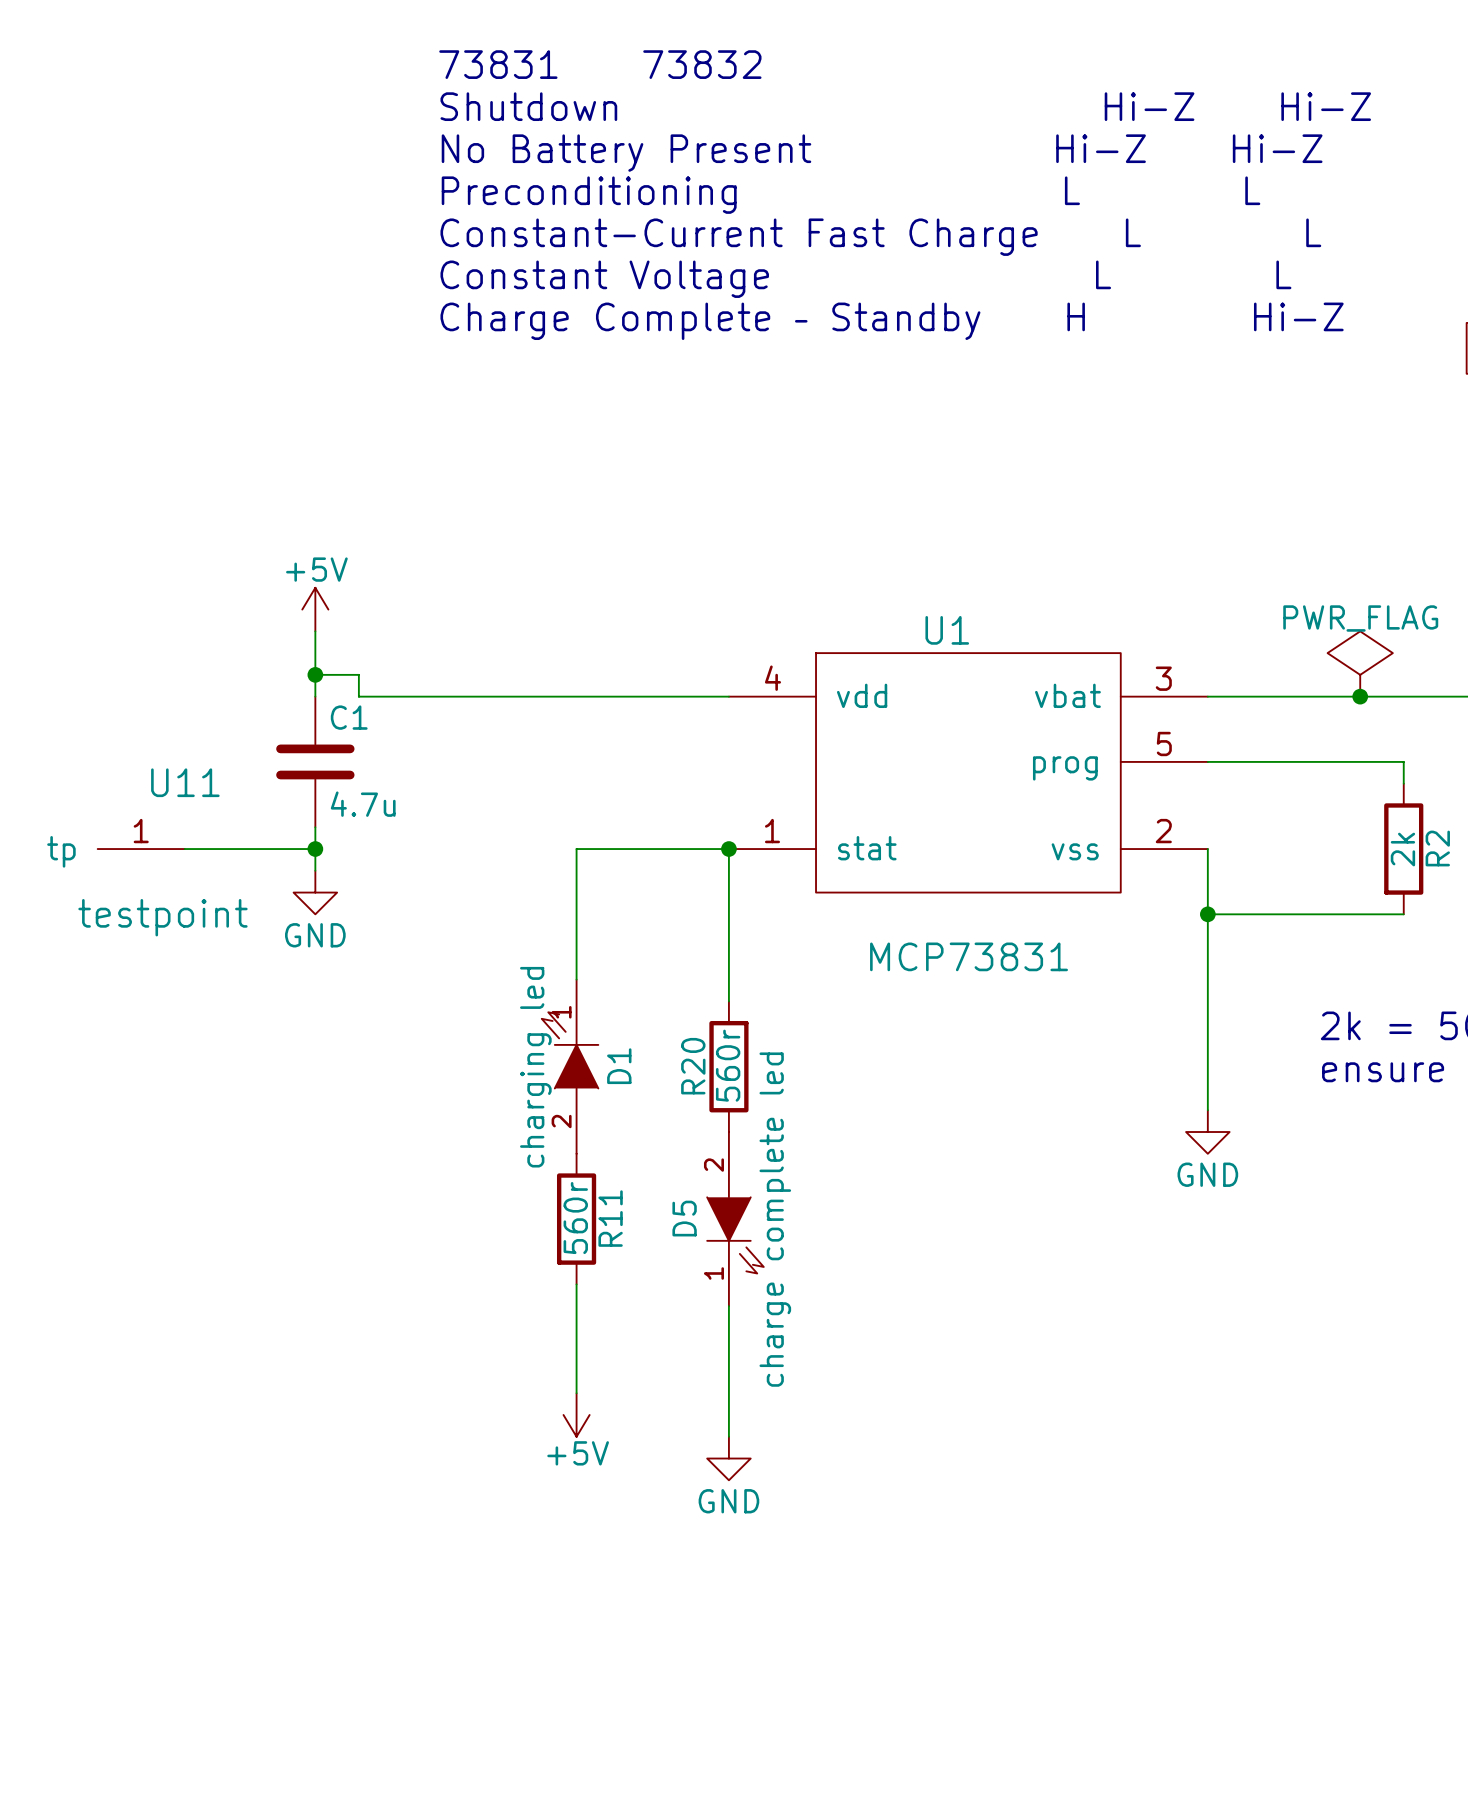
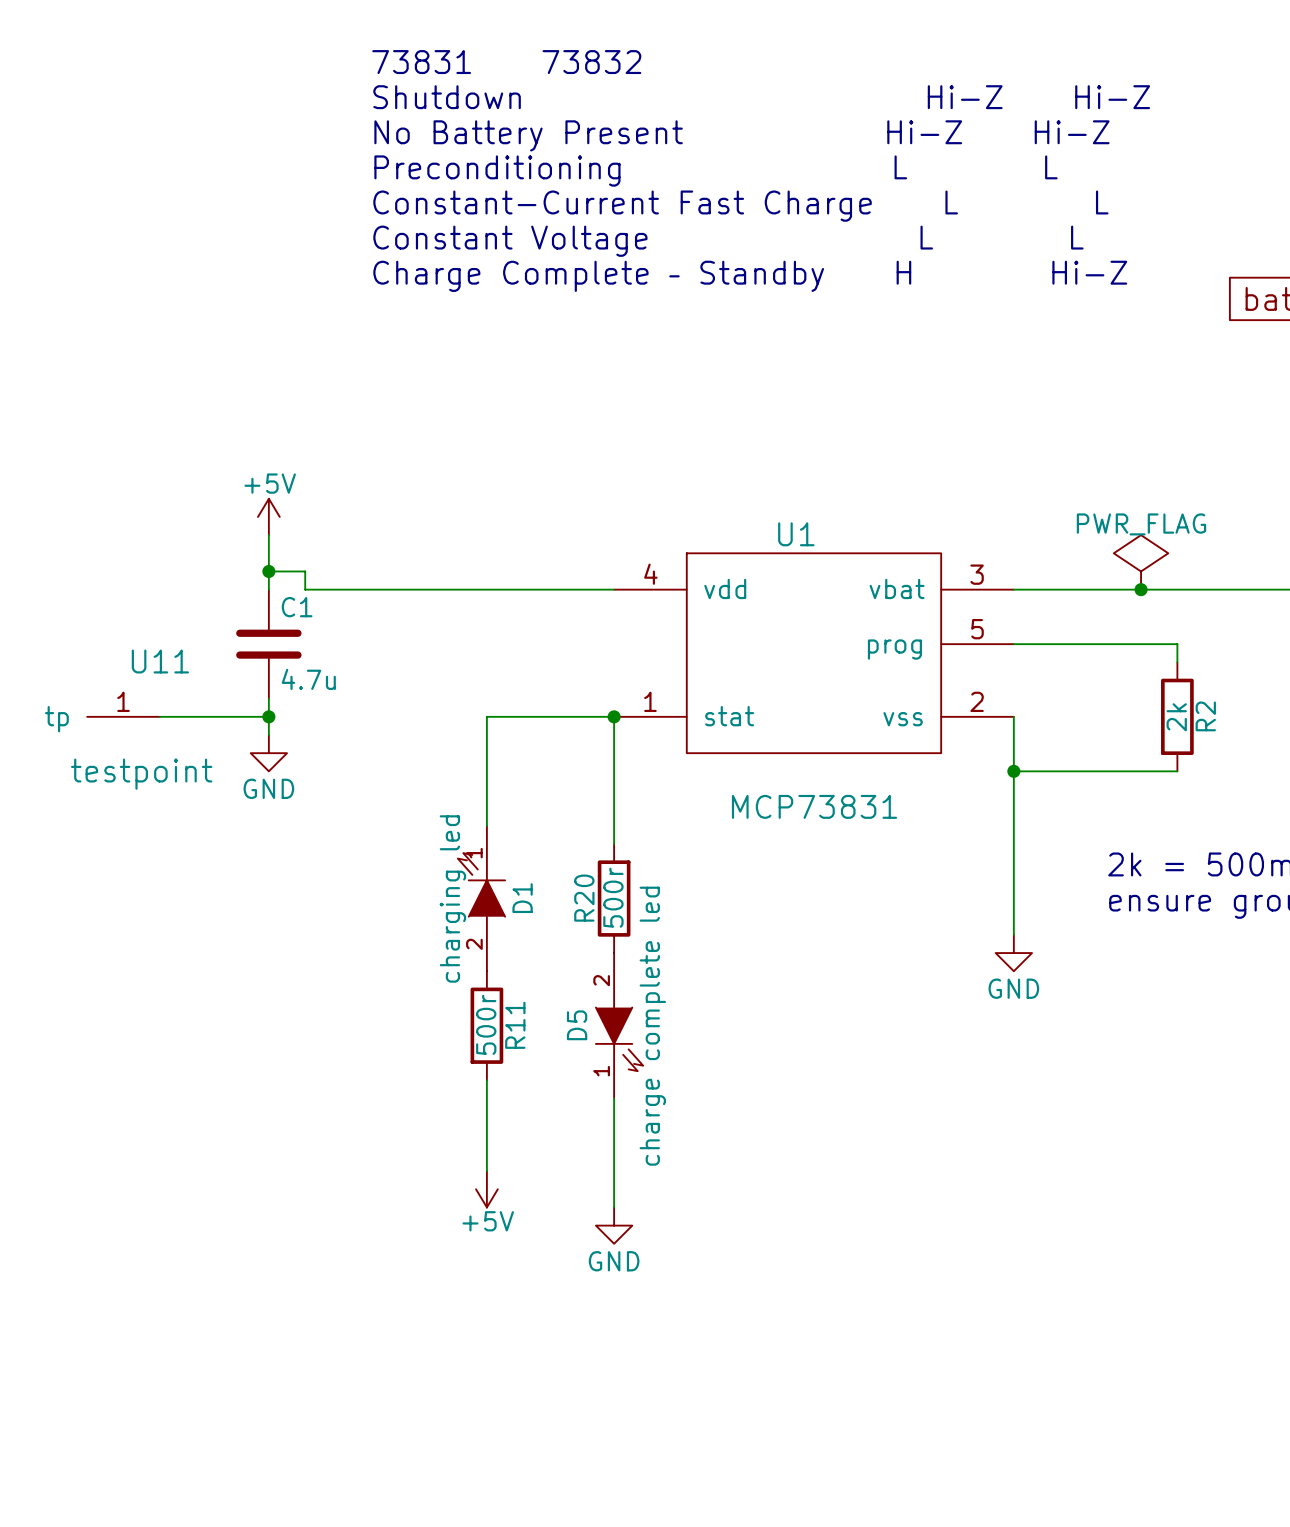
R20 value: 560r (728, 1065) -> 500r (613, 897)
R11 value: 560r (575, 1218) -> 500r (486, 1024)

